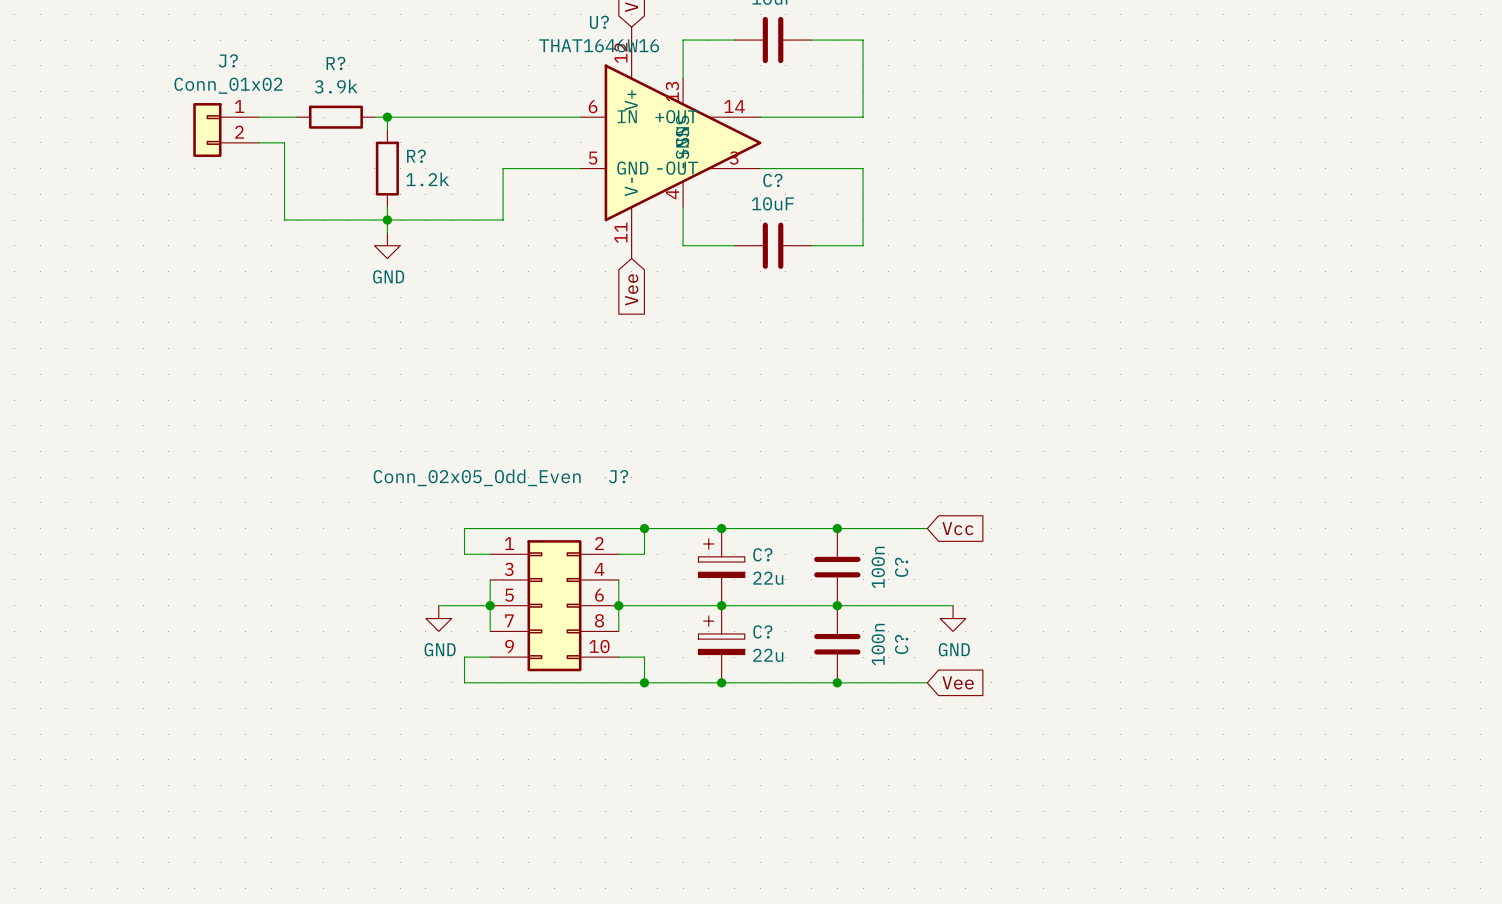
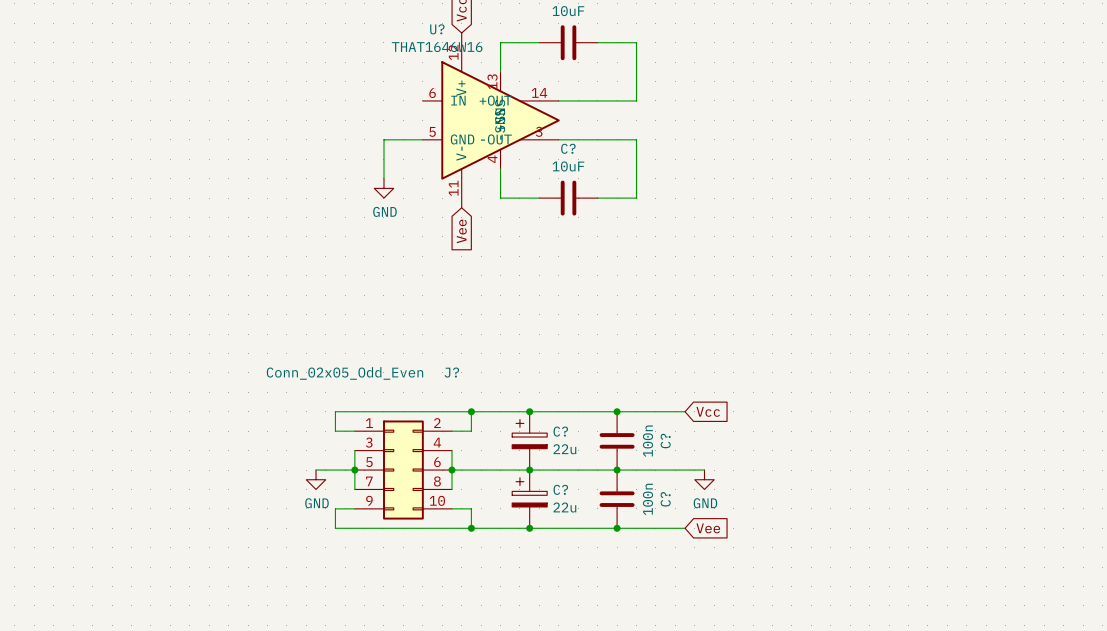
wire: (258, 117) (297, 117) -> none
R?: 3.9k (335, 117) -> none
wire: (374, 117) (580, 117) -> none
wire: (387, 117) (387, 130) -> none
junction: (387, 117) -> none
J?: Conn_01x02 (226, 130) -> none
wire: (258, 142) (284, 142) (284, 220) (503, 220) (503, 168) (528, 168) -> (383, 178) (383, 139)
R?: 1.2k (387, 168) -> none
wire: (387, 207) (387, 232) -> none
junction: (387, 220) -> none
power symbol position: GND (387, 245) -> GND (383, 188)

